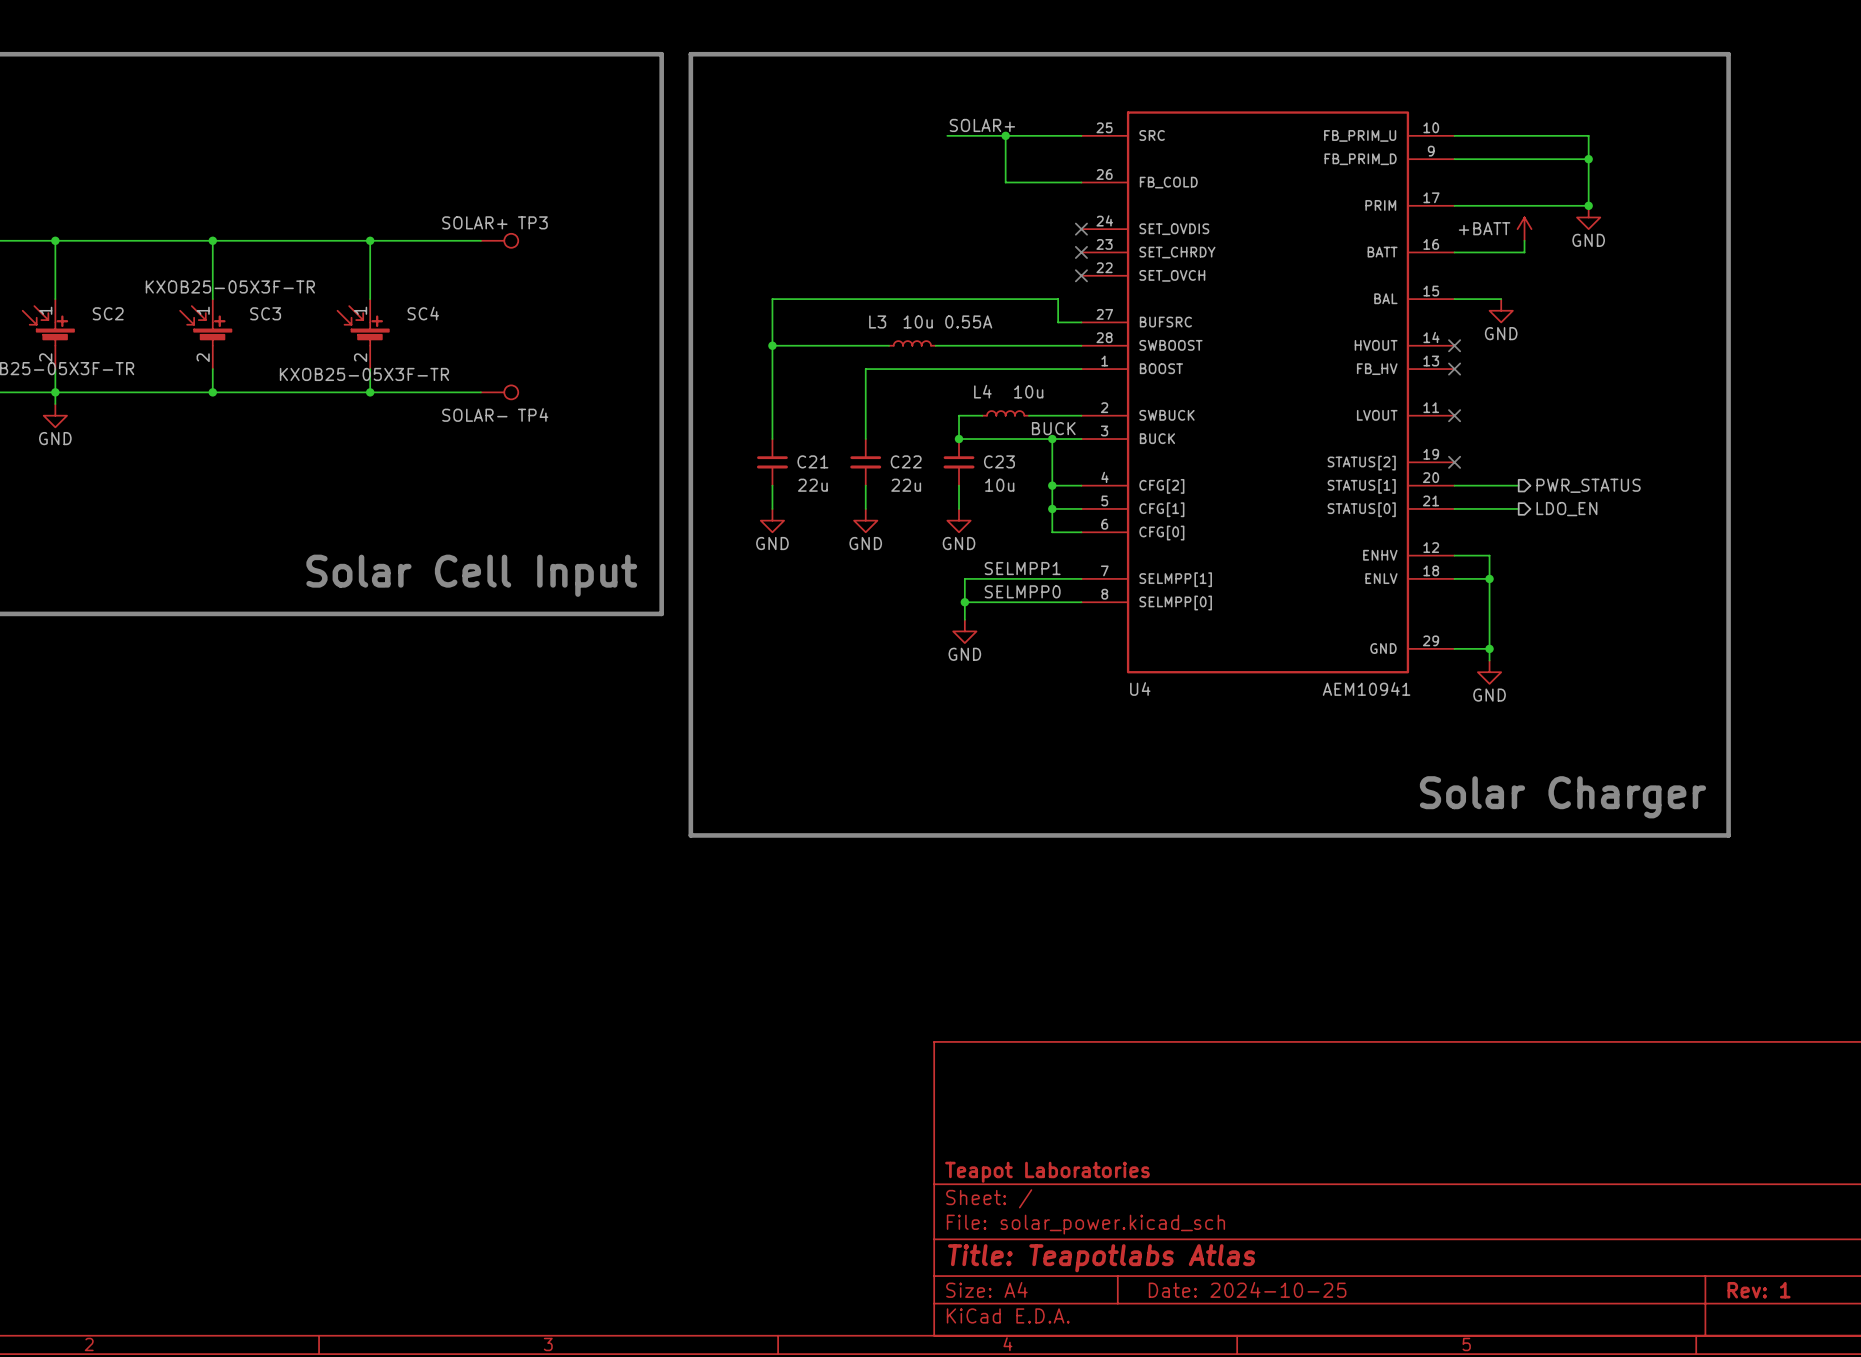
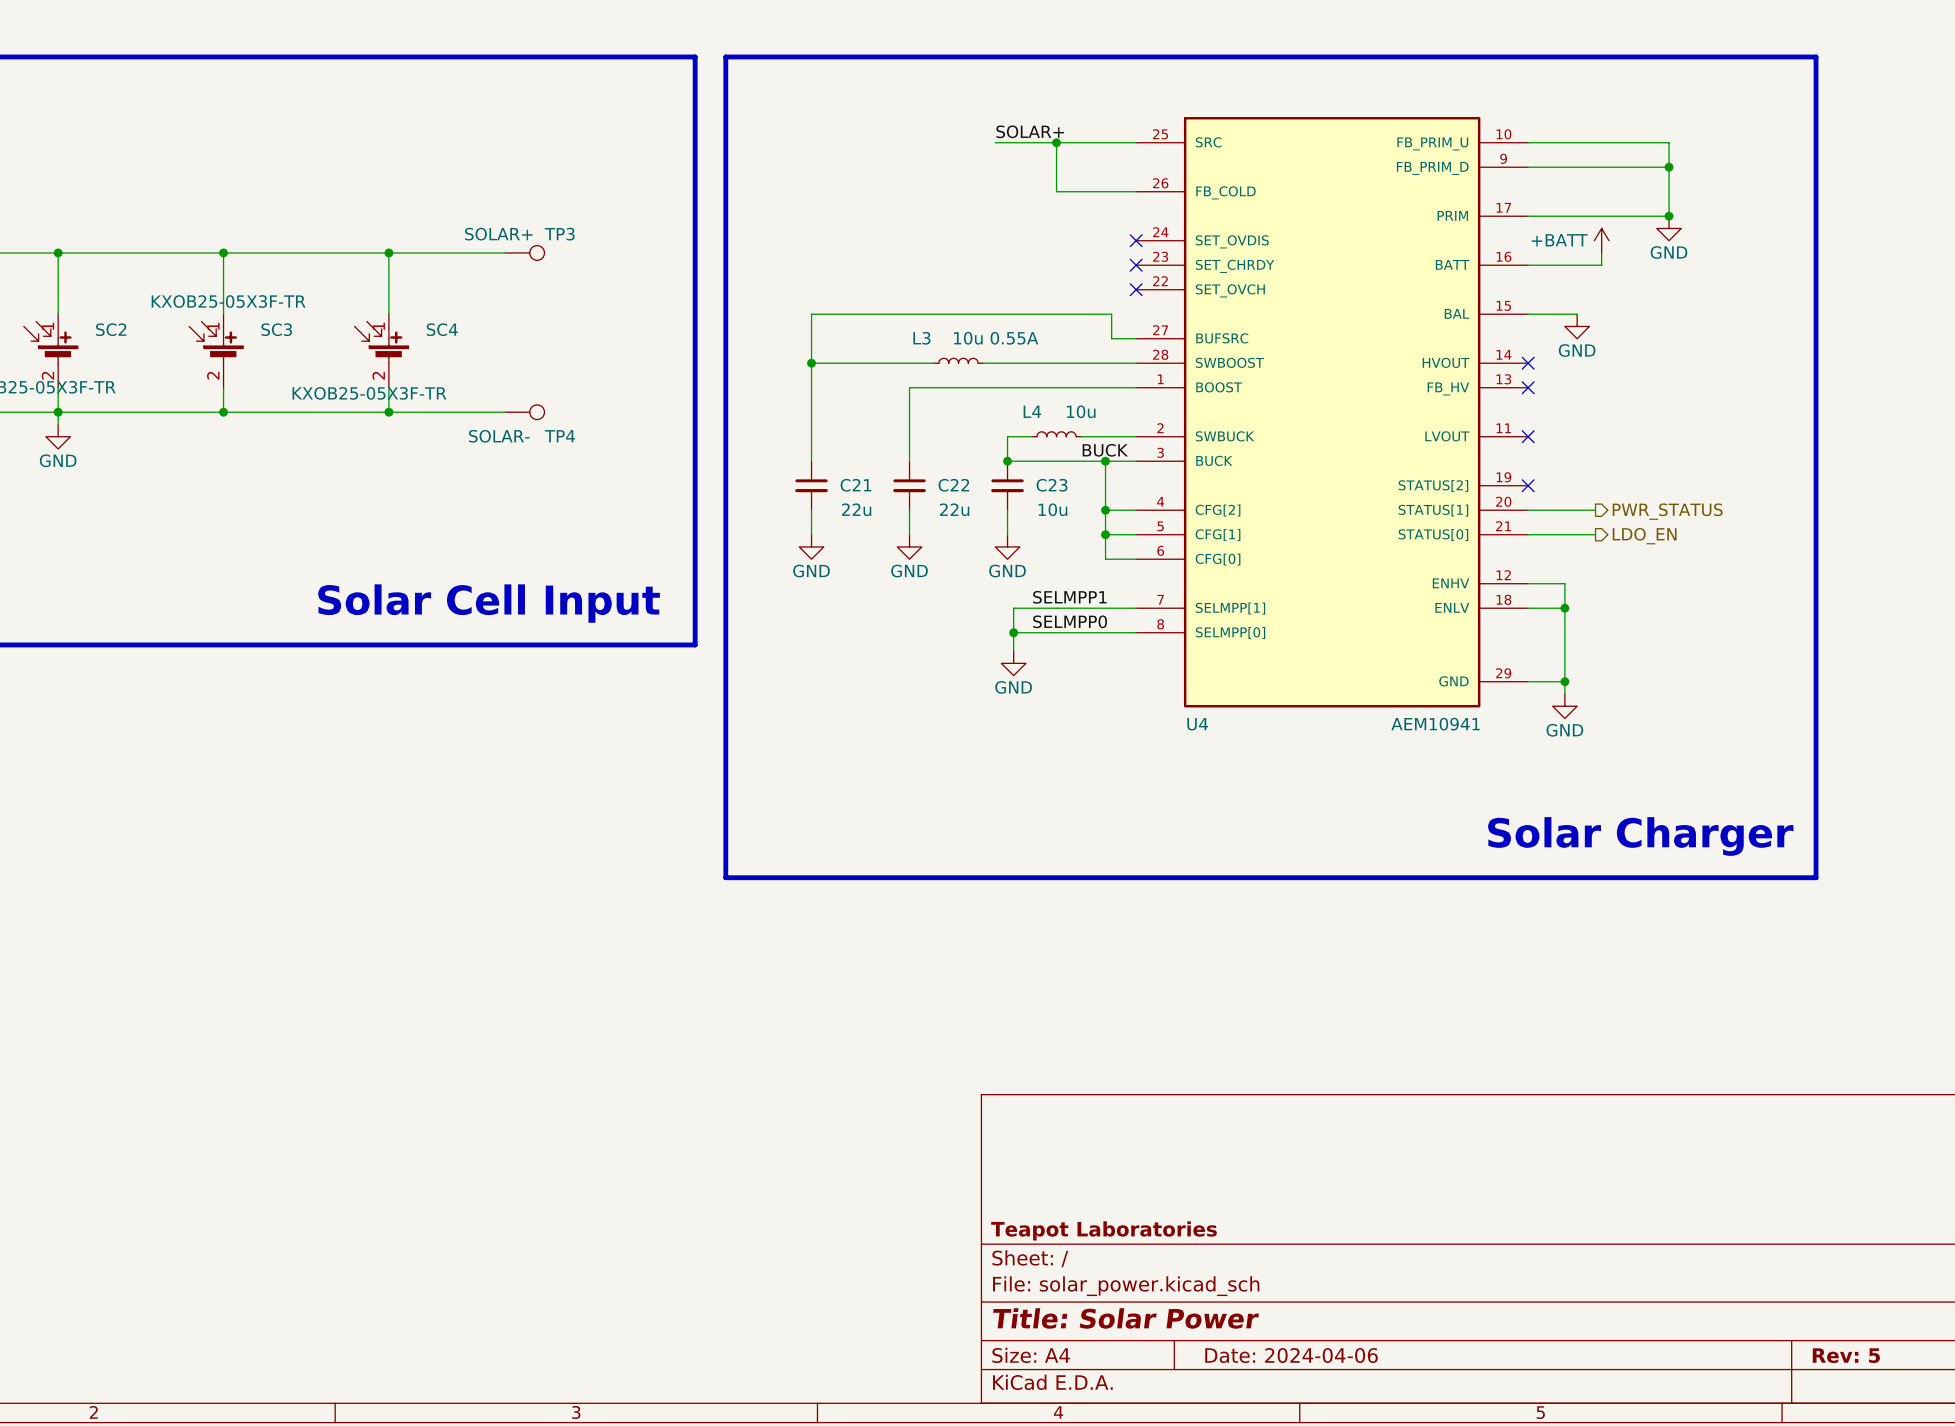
title block: Title: Teapotlabs Atlas (1101, 1258) -> Title: Solar Power (1126, 1318)
title block: Date: 2024-10-25 (1247, 1289) -> Date: 2024-04-06 (1291, 1355)
title block: Rev: 1 (1759, 1290) -> Rev: 5 (1846, 1355)

